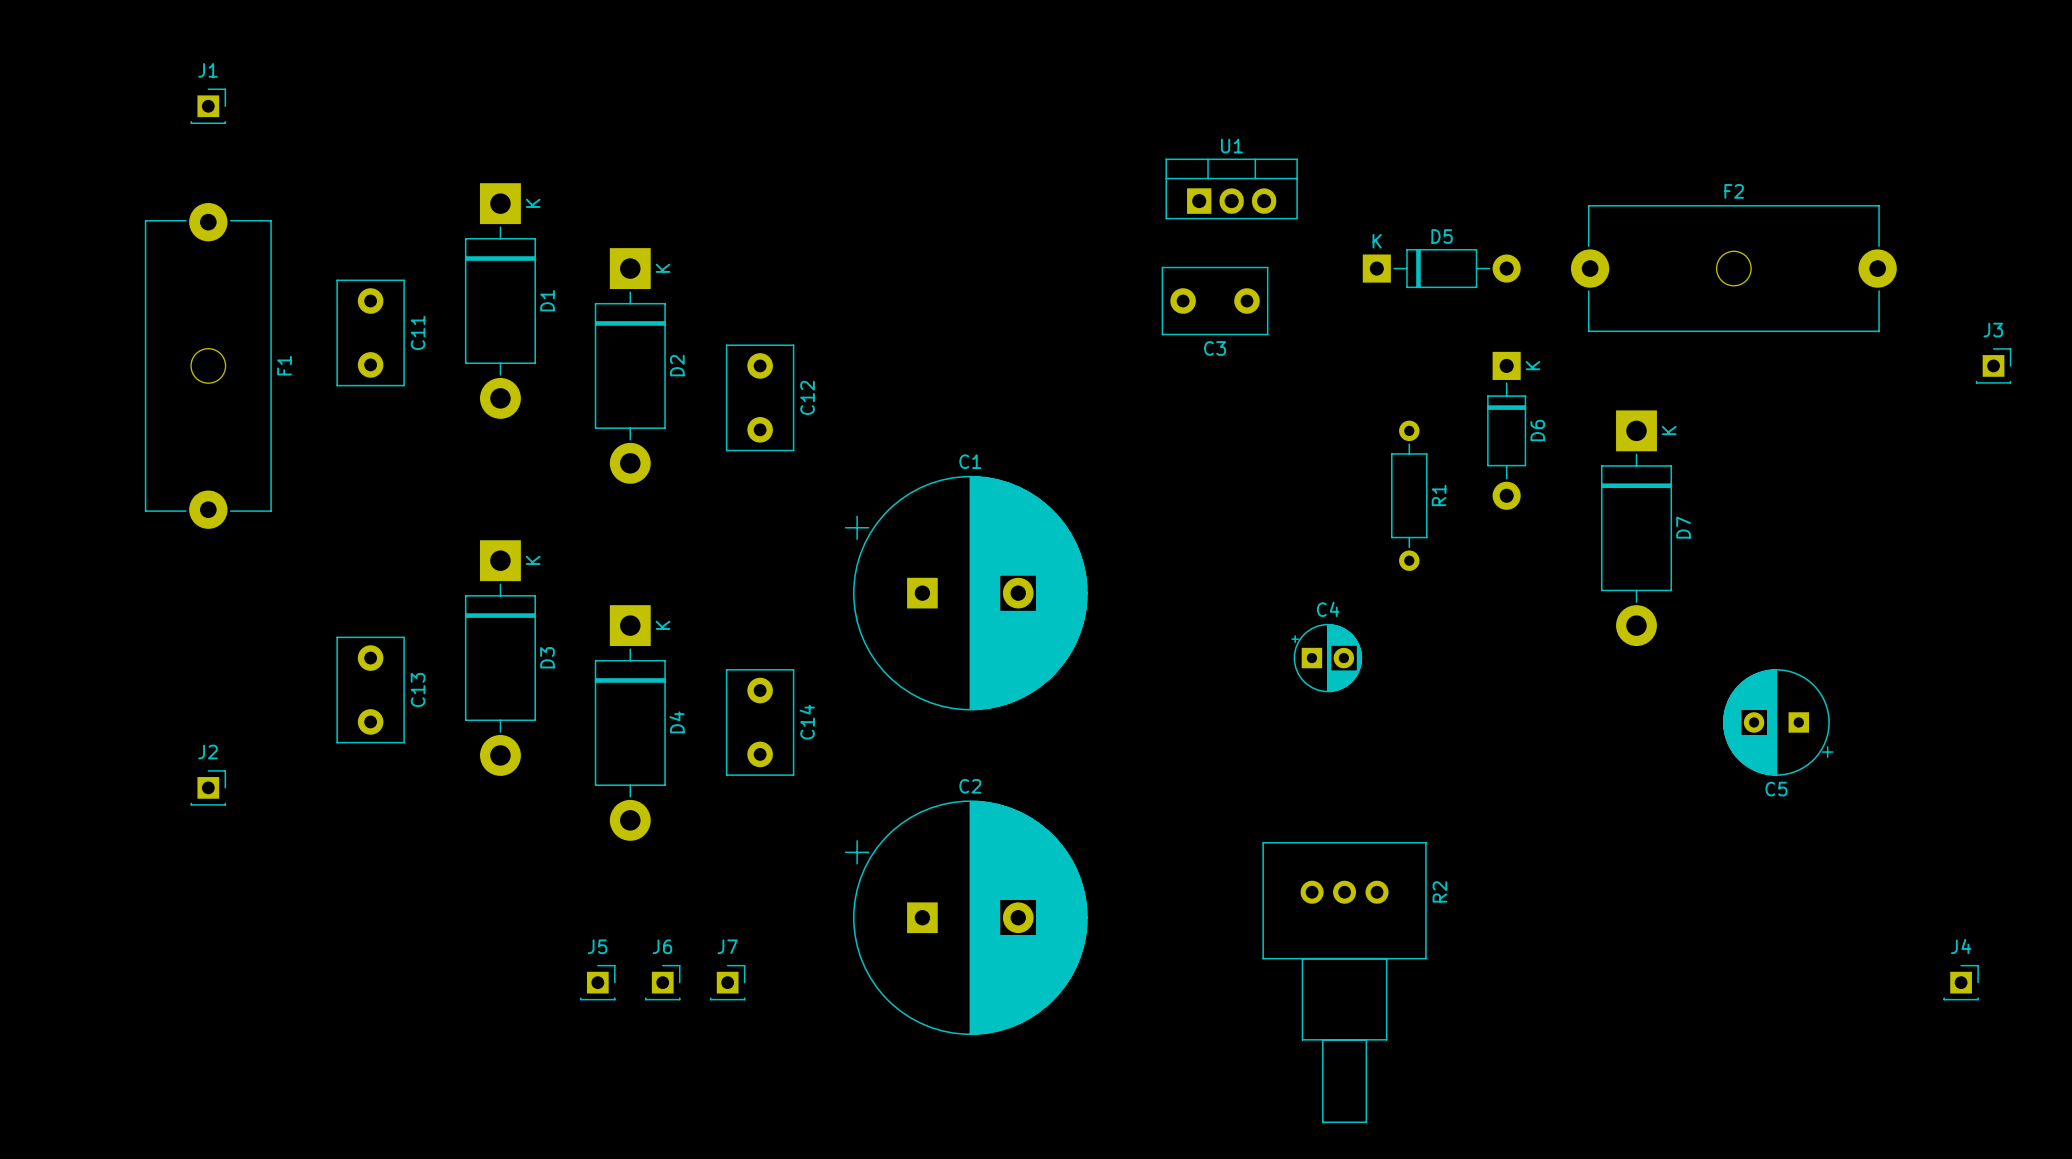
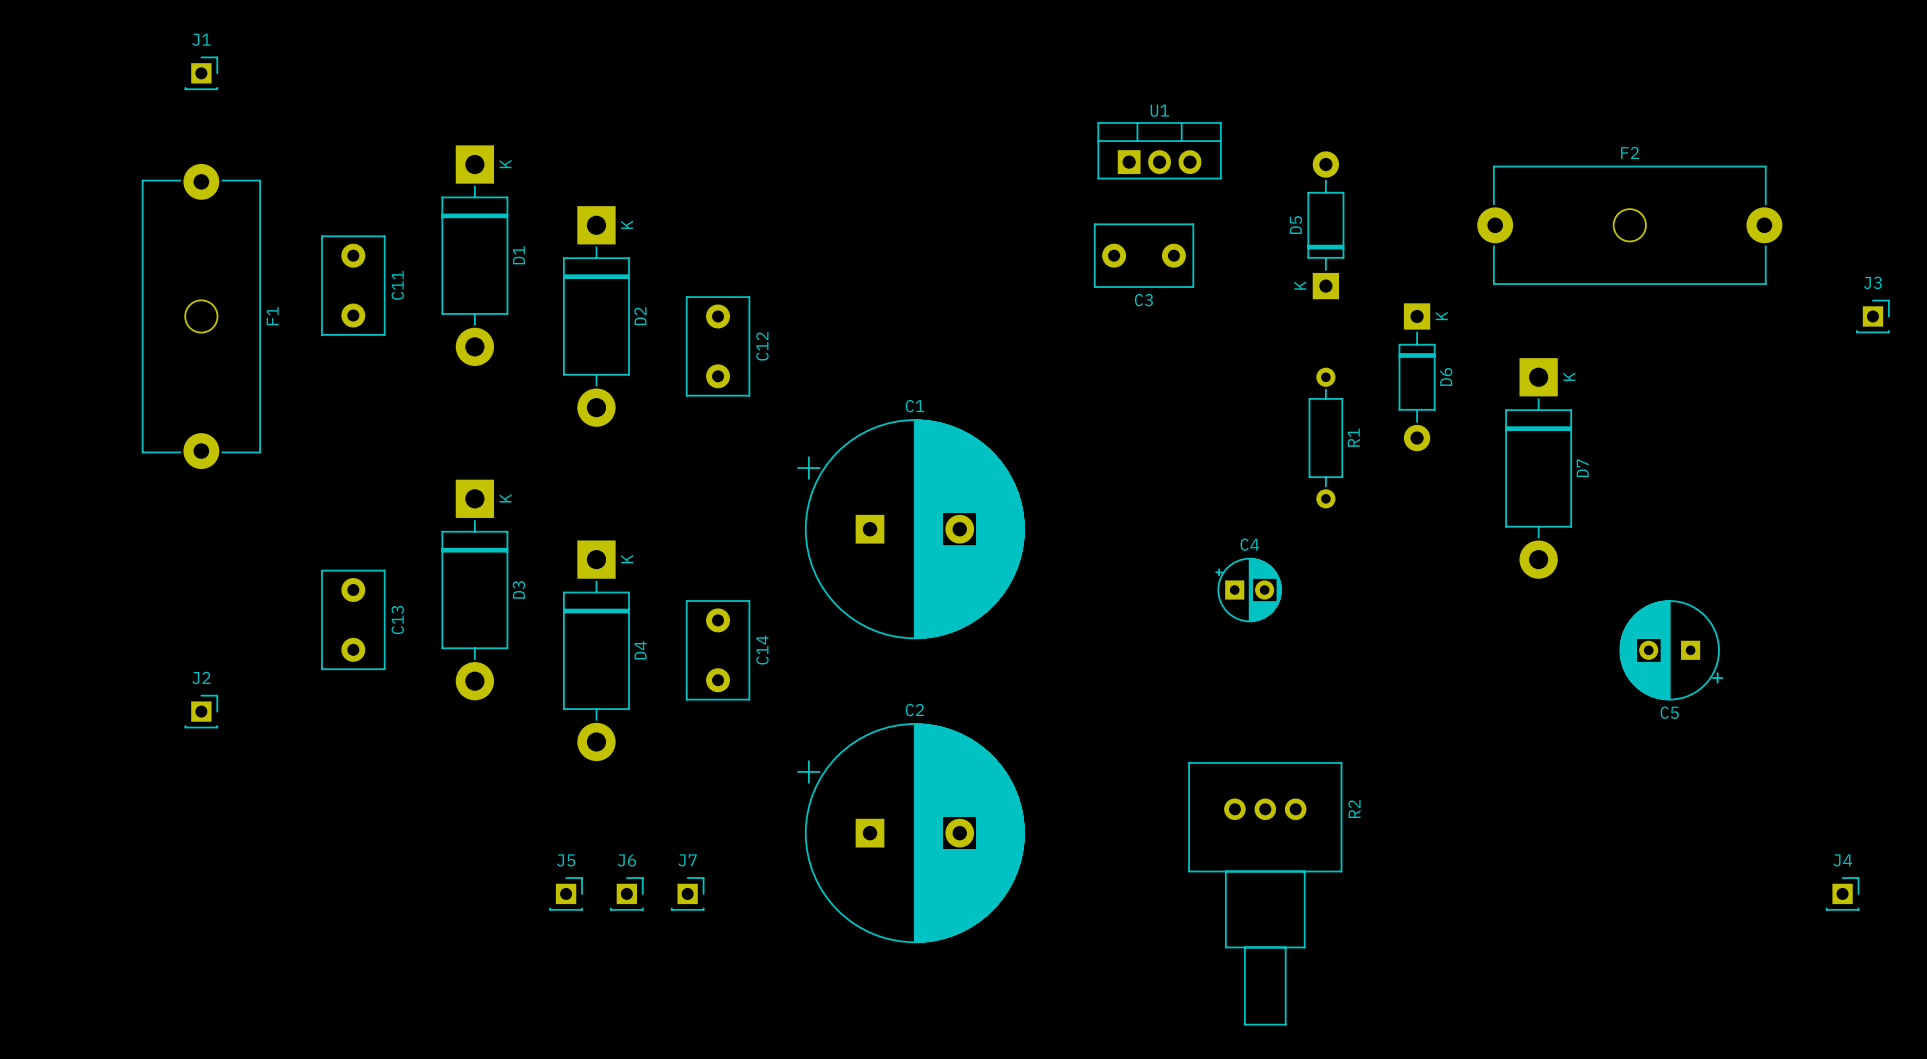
D5 rotation: 0° (1441, 268) -> 90° counterclockwise (1325, 225)

